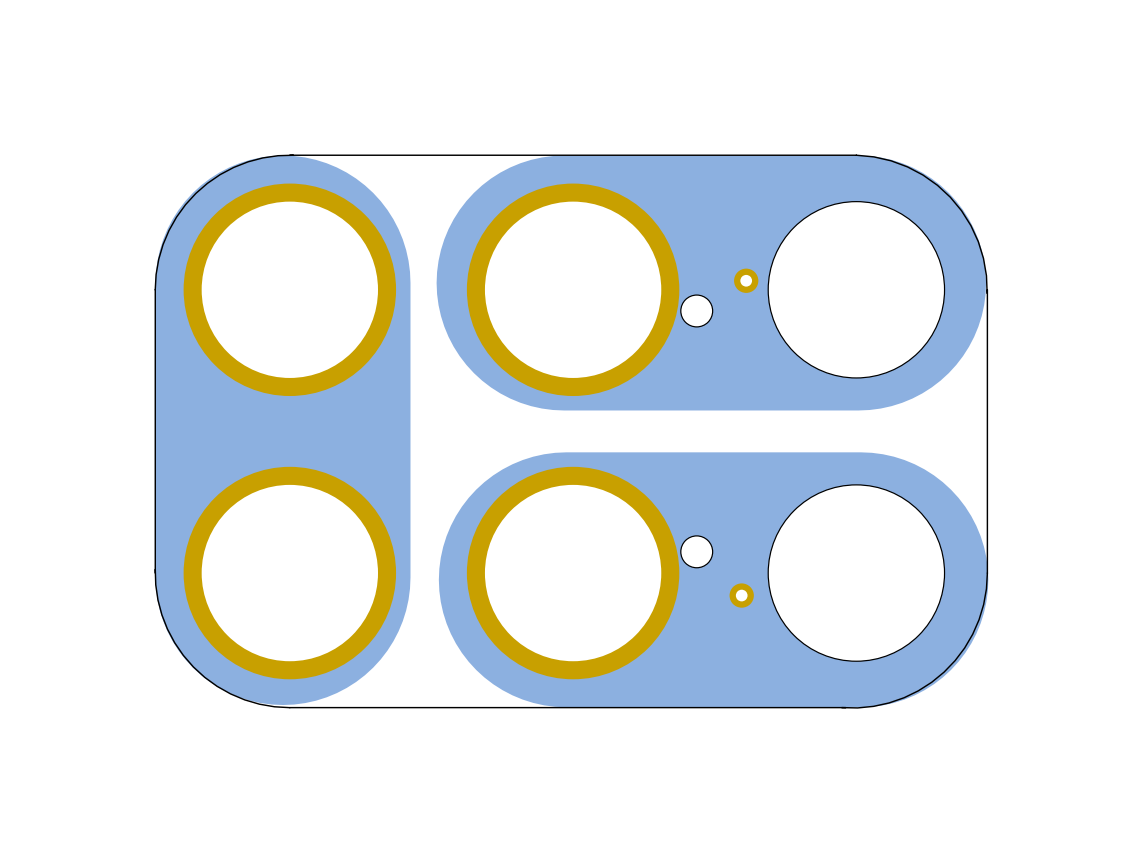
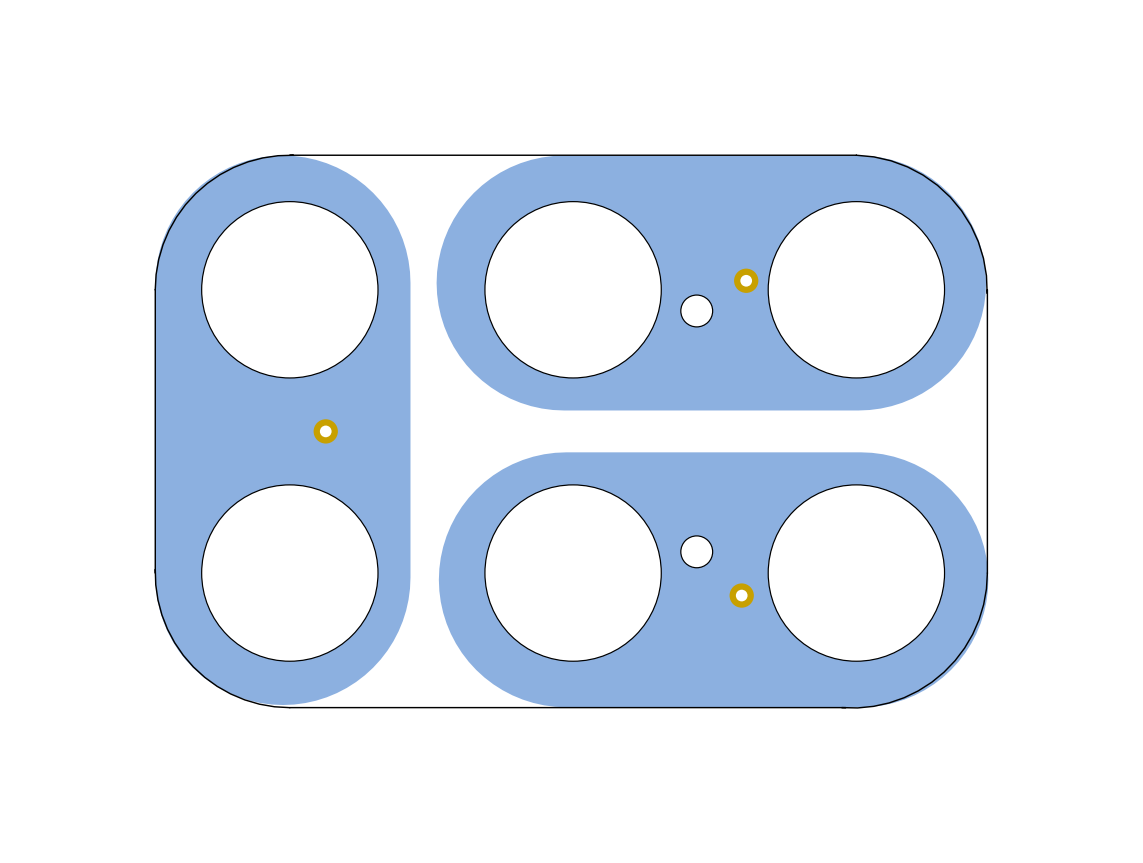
part footprint: [154, 154, 989, 709] -> [154, 154, 989, 709]

